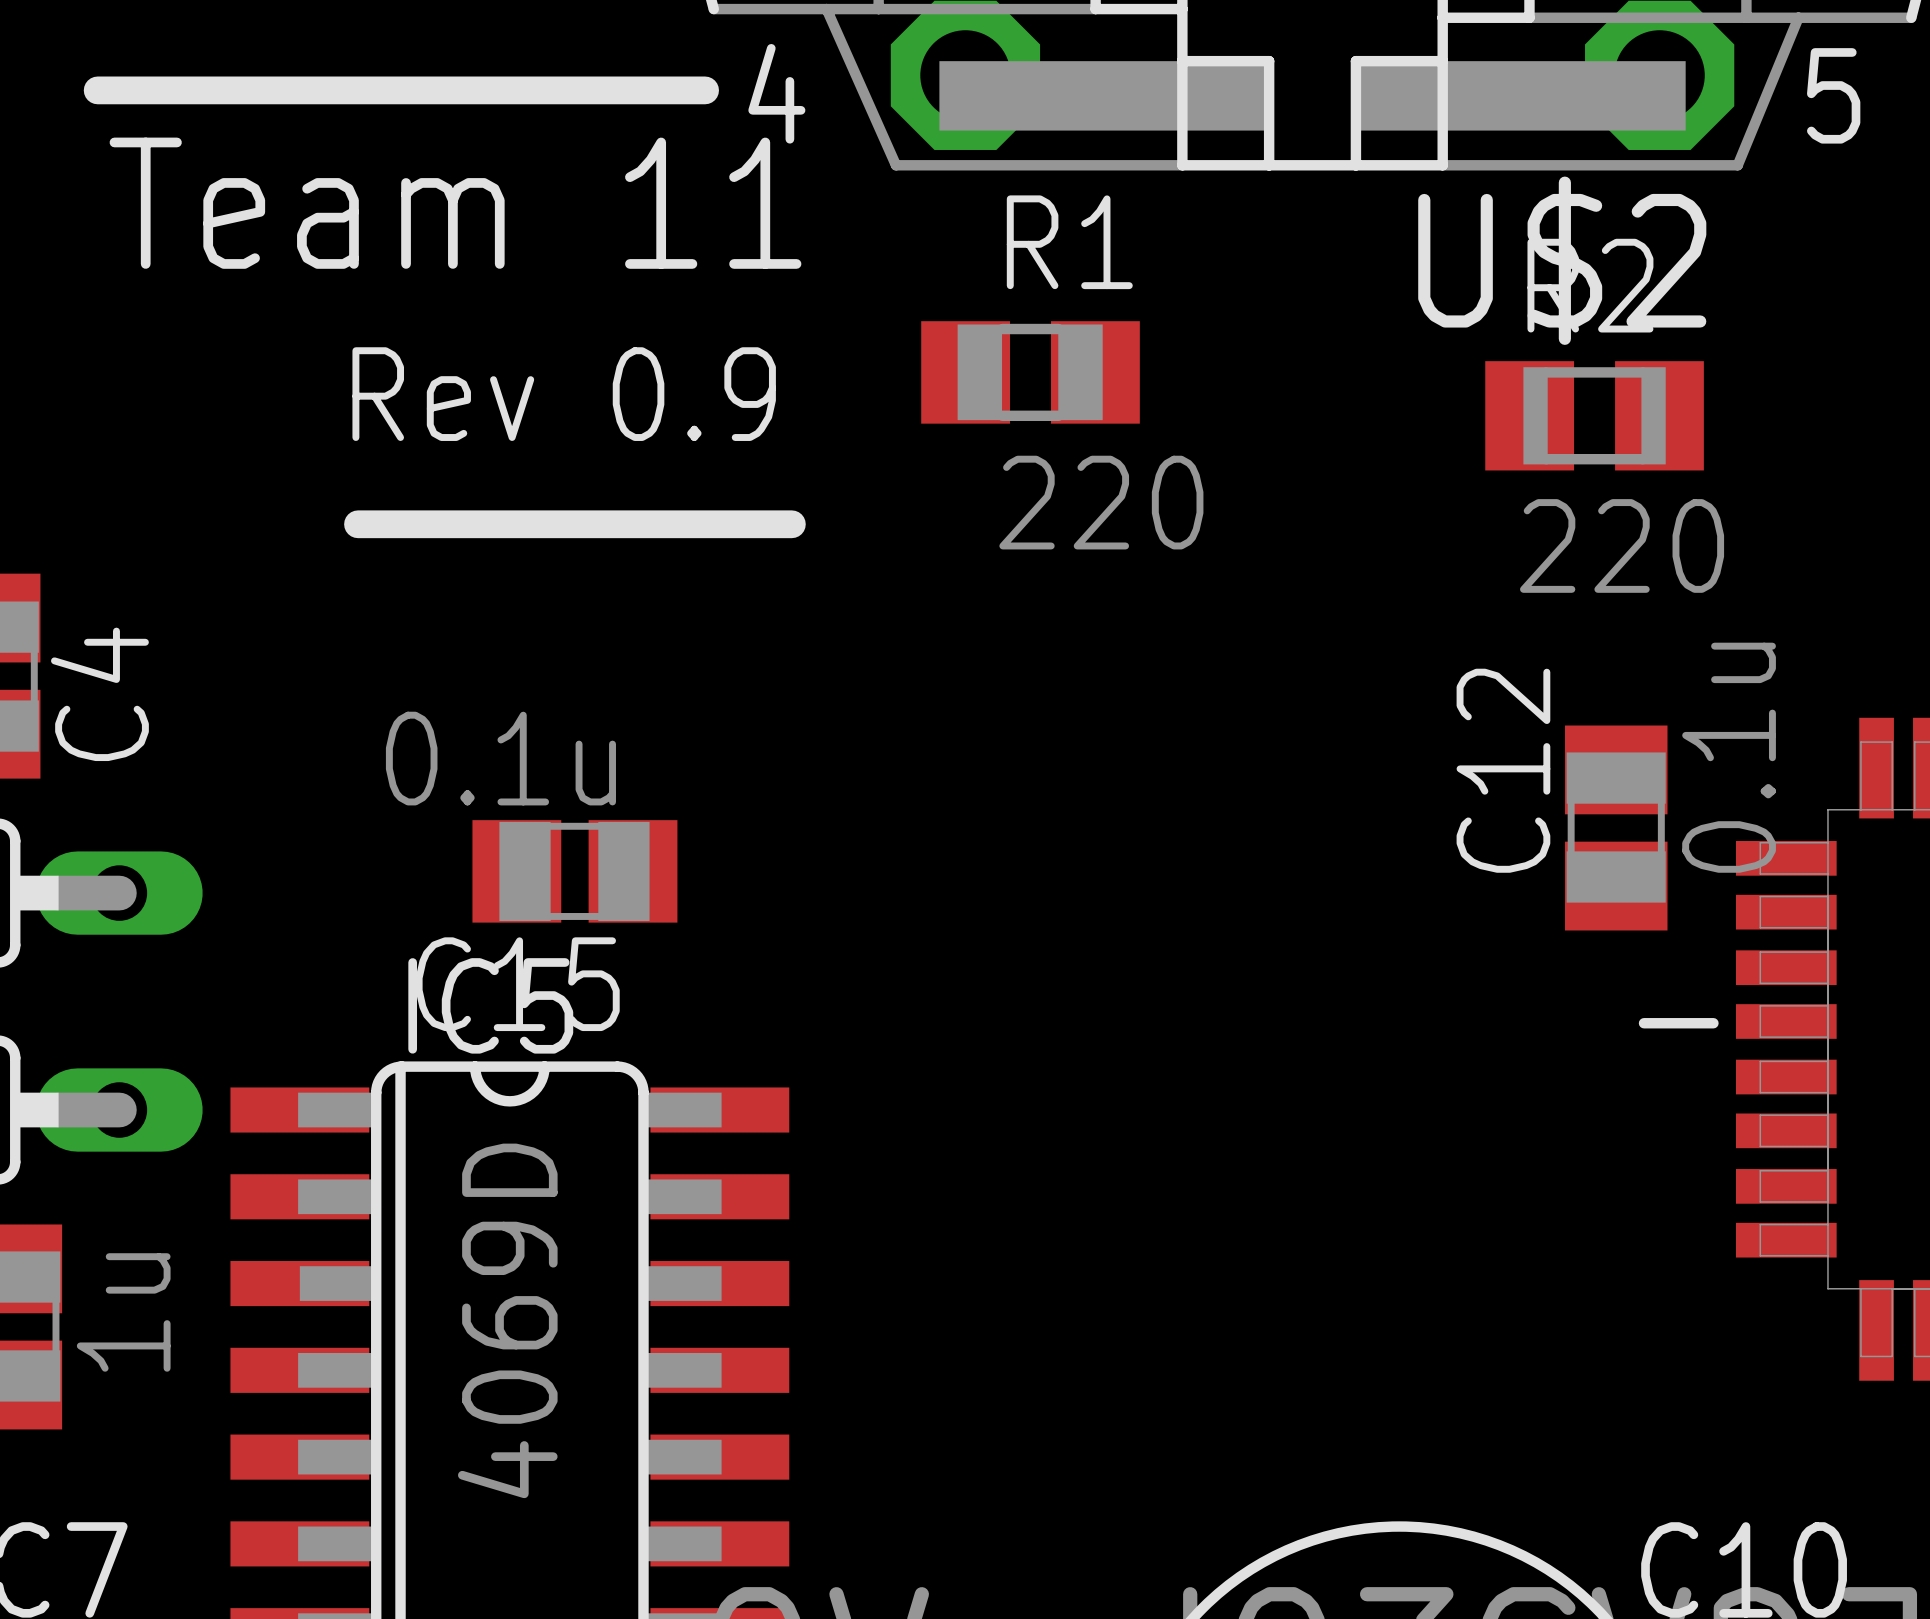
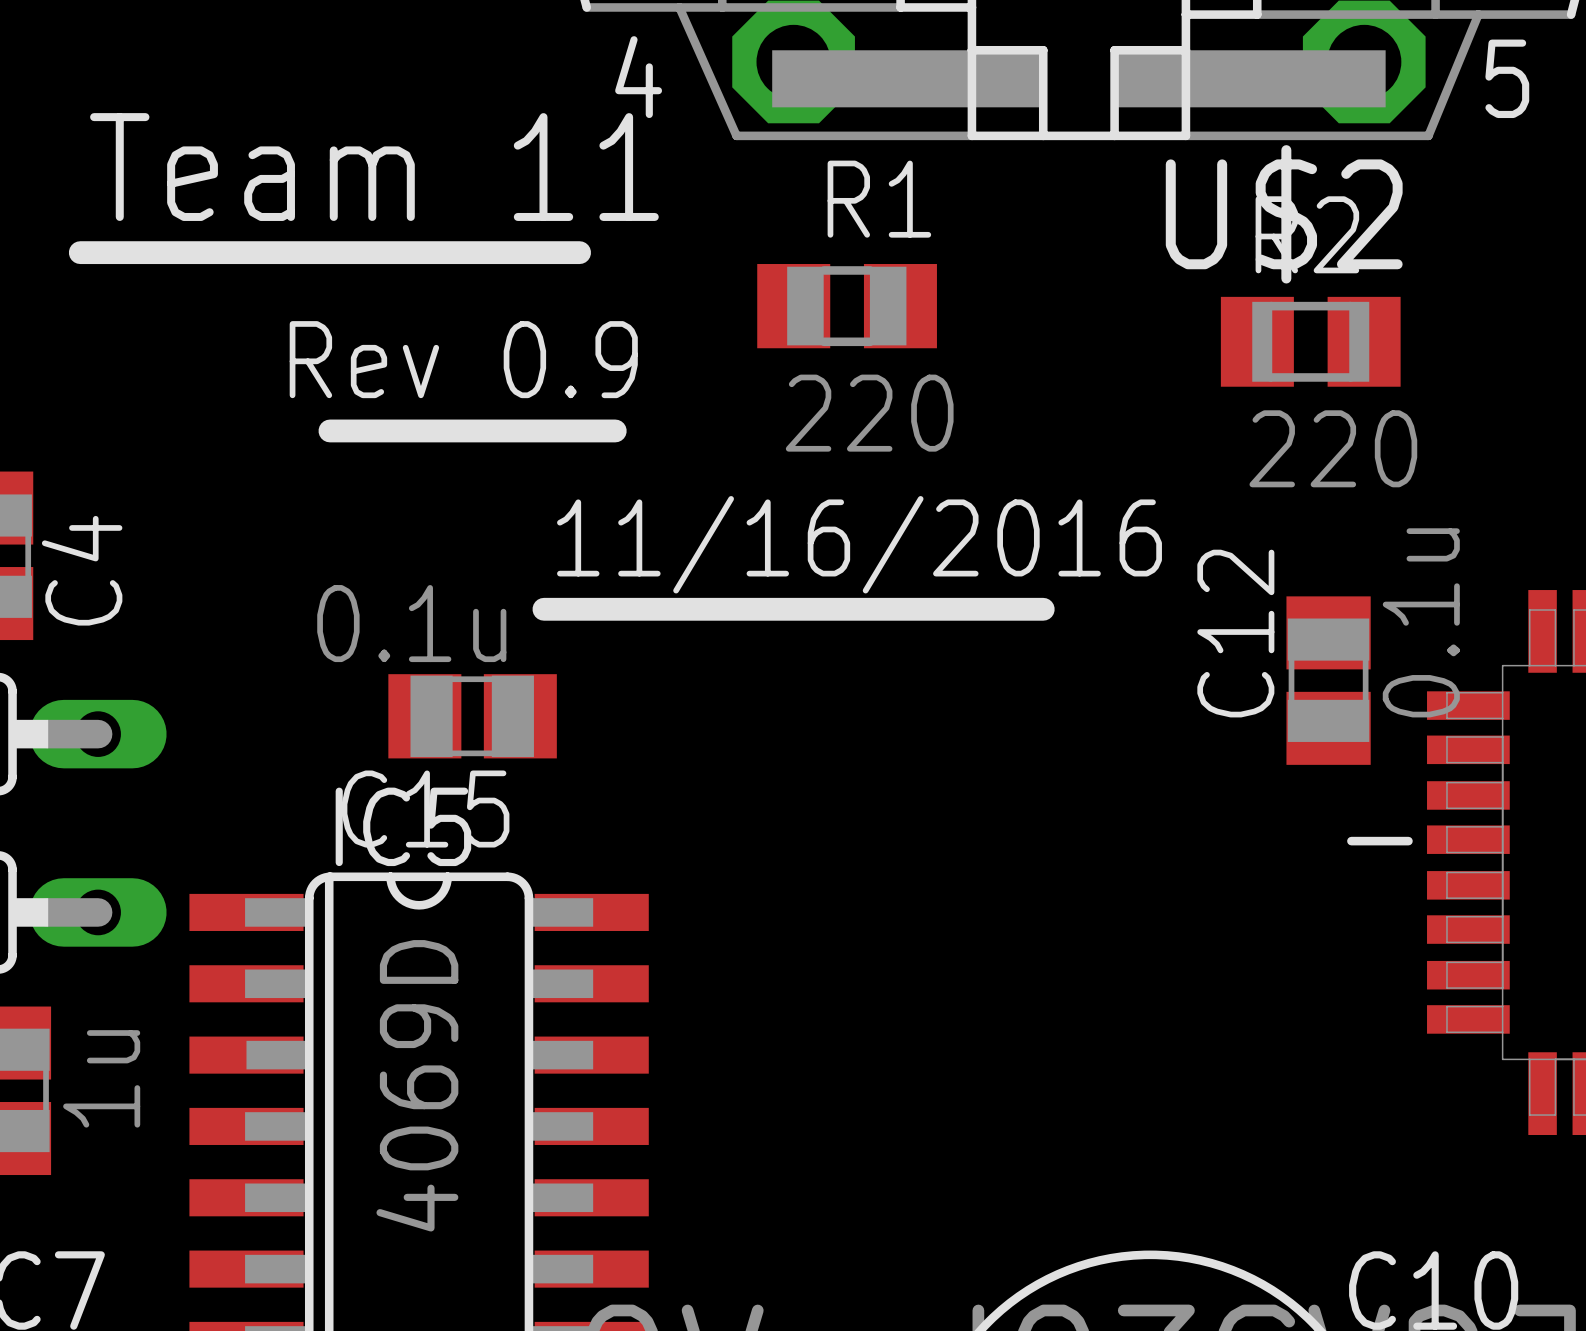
line: (97, 90) (705, 90) -> (80, 252) (579, 252)
text position: Rev 0.9 (564, 394) -> Rev 0.9 (463, 359)
R1 value position: 220 (1101, 502) -> 220 (869, 413)
line: (358, 524) (401, 524) -> none
line: (748, 524) (791, 524) -> none
text: none -> 11/16/2016 (859, 544)
line: none -> (543, 609) (1043, 609)

